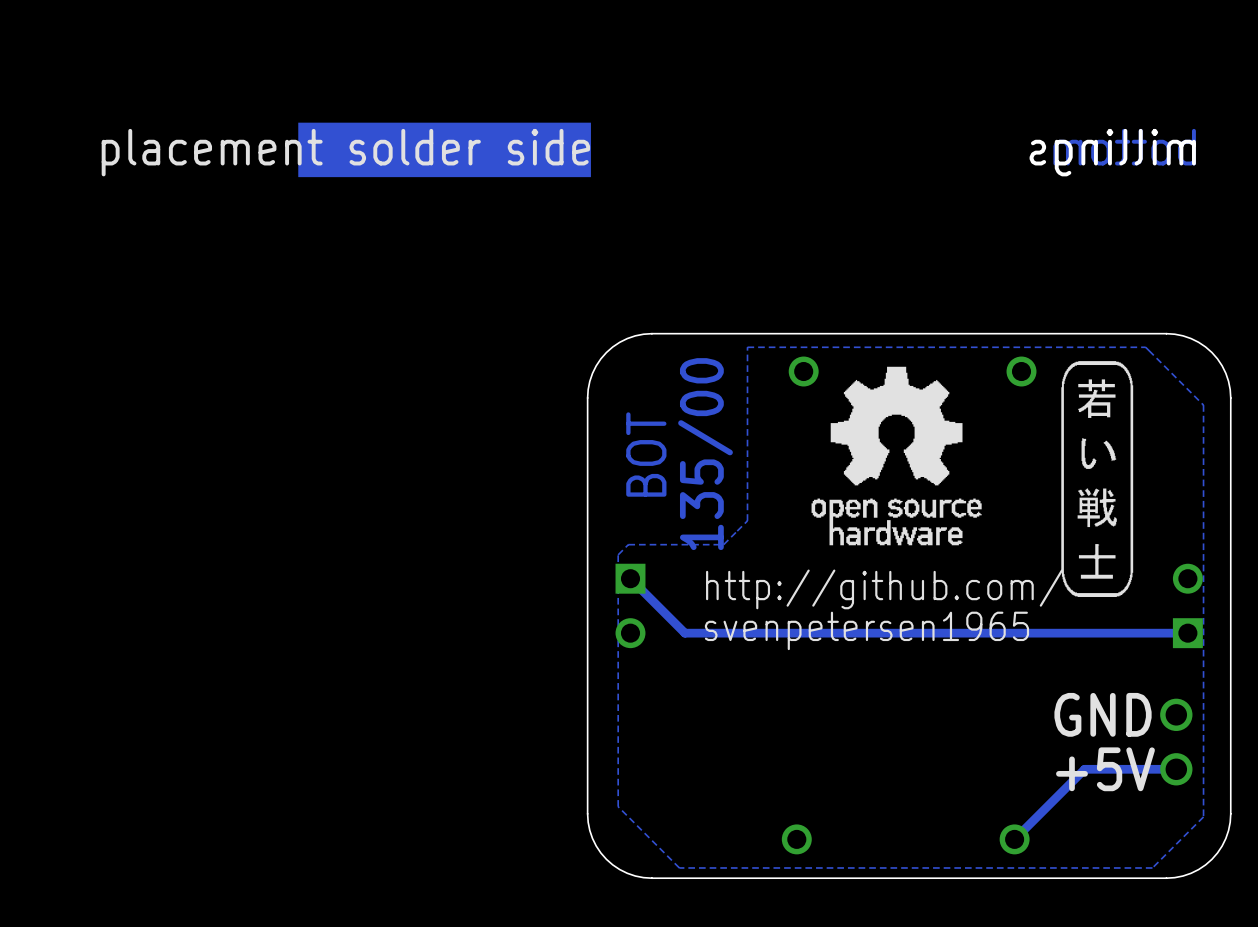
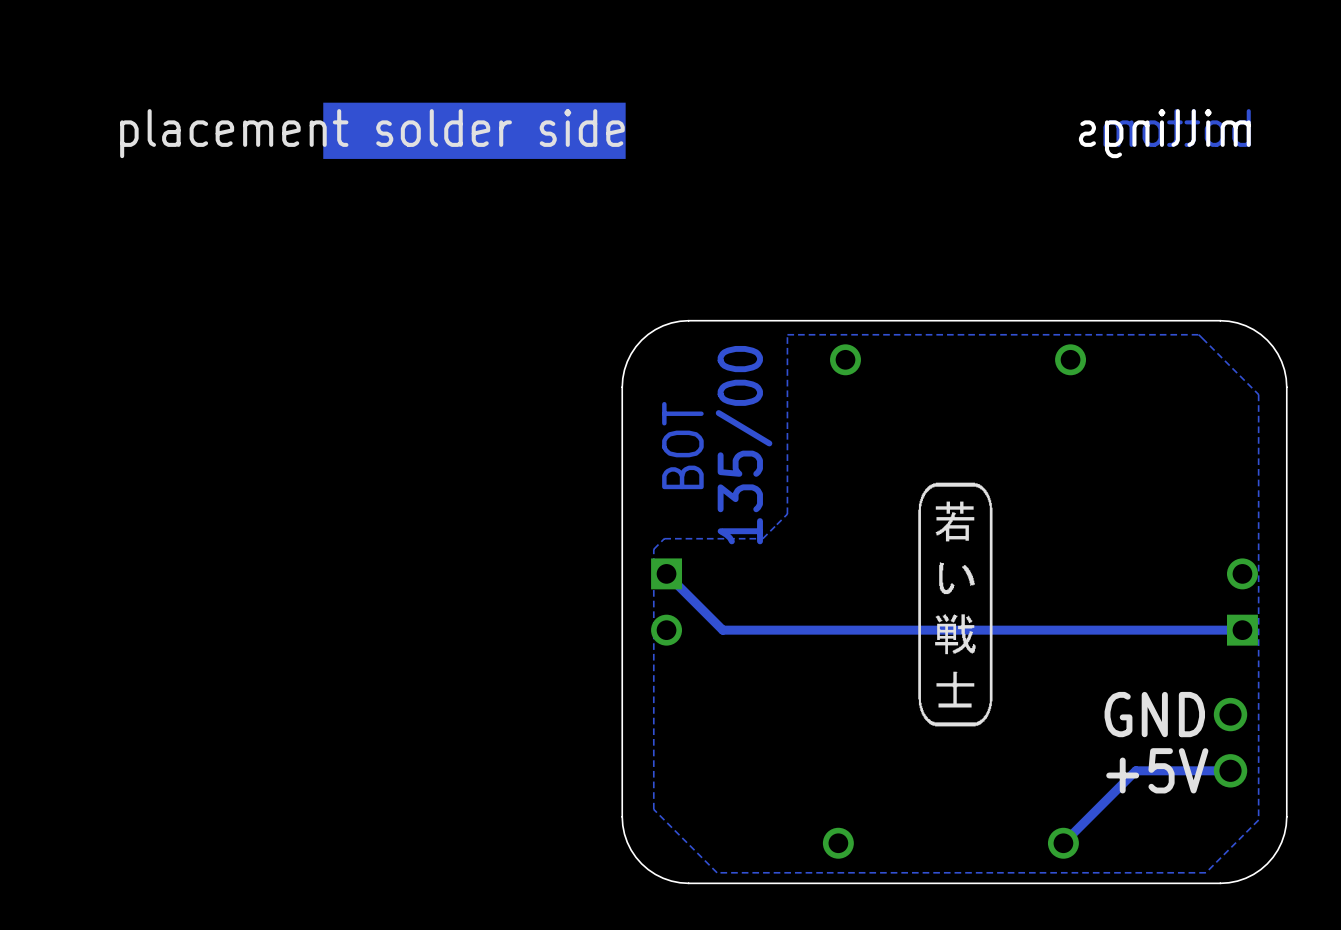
drawing: [811, 366, 982, 546] -> none
drawing position: (1097, 479) -> (955, 604)
text: http://github.com/ (884, 589) -> none
text: svenpetersen1965 (866, 630) -> none

